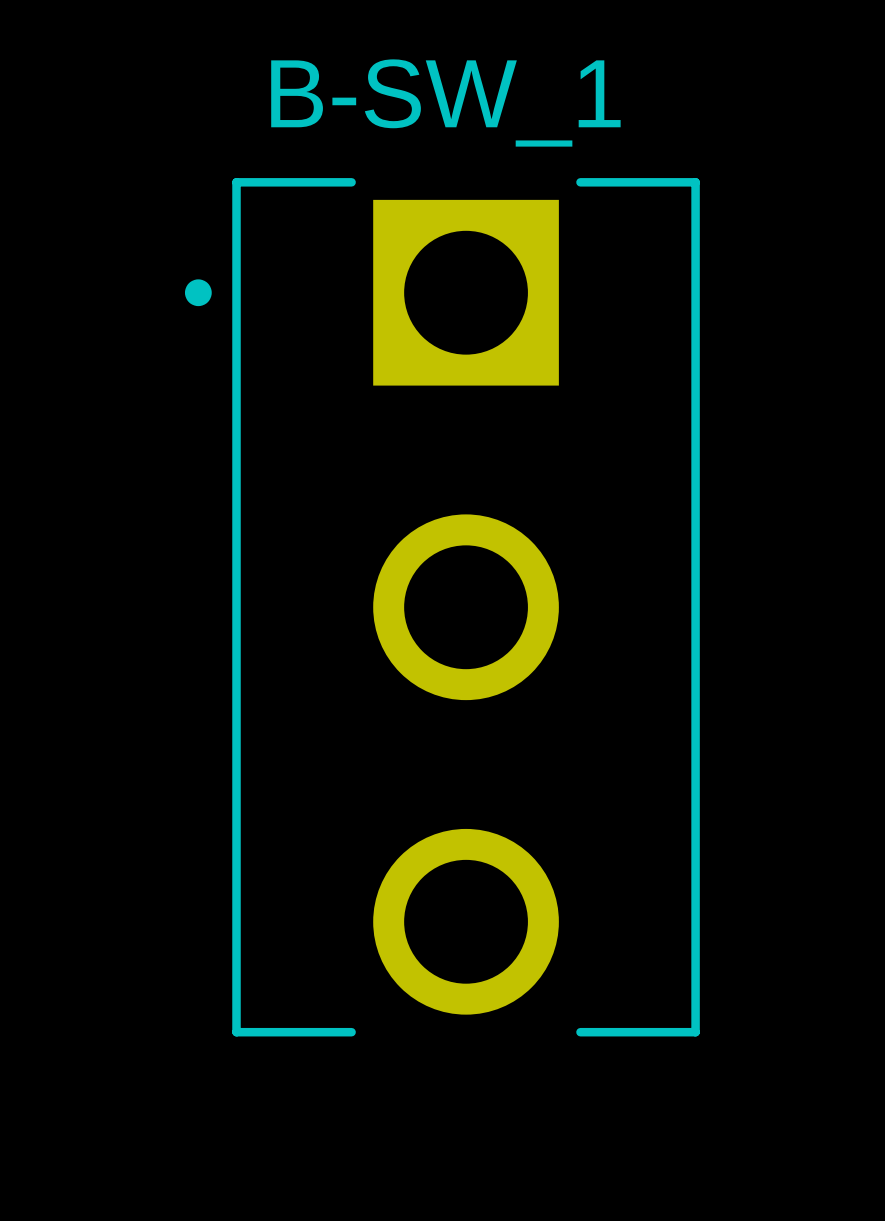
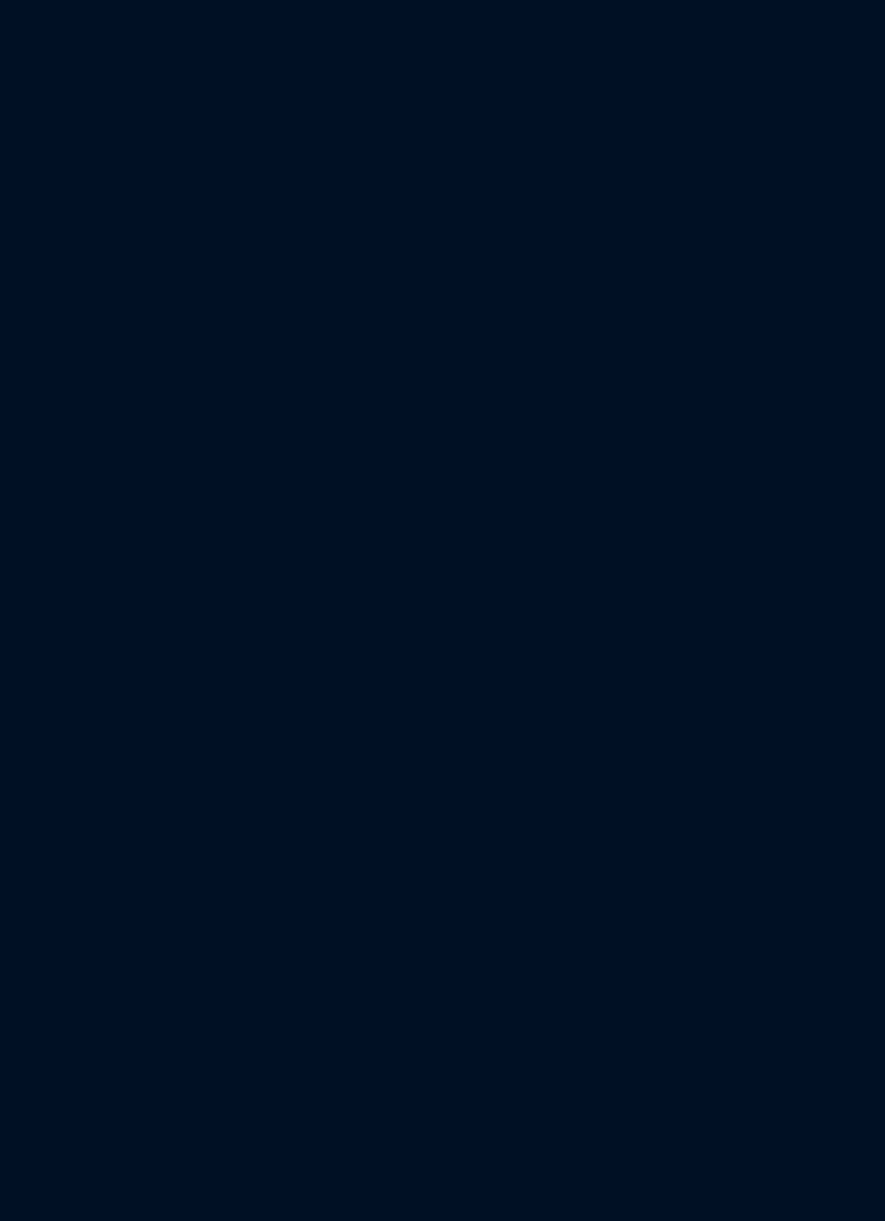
B-SW_1: (442, 607) -> none

